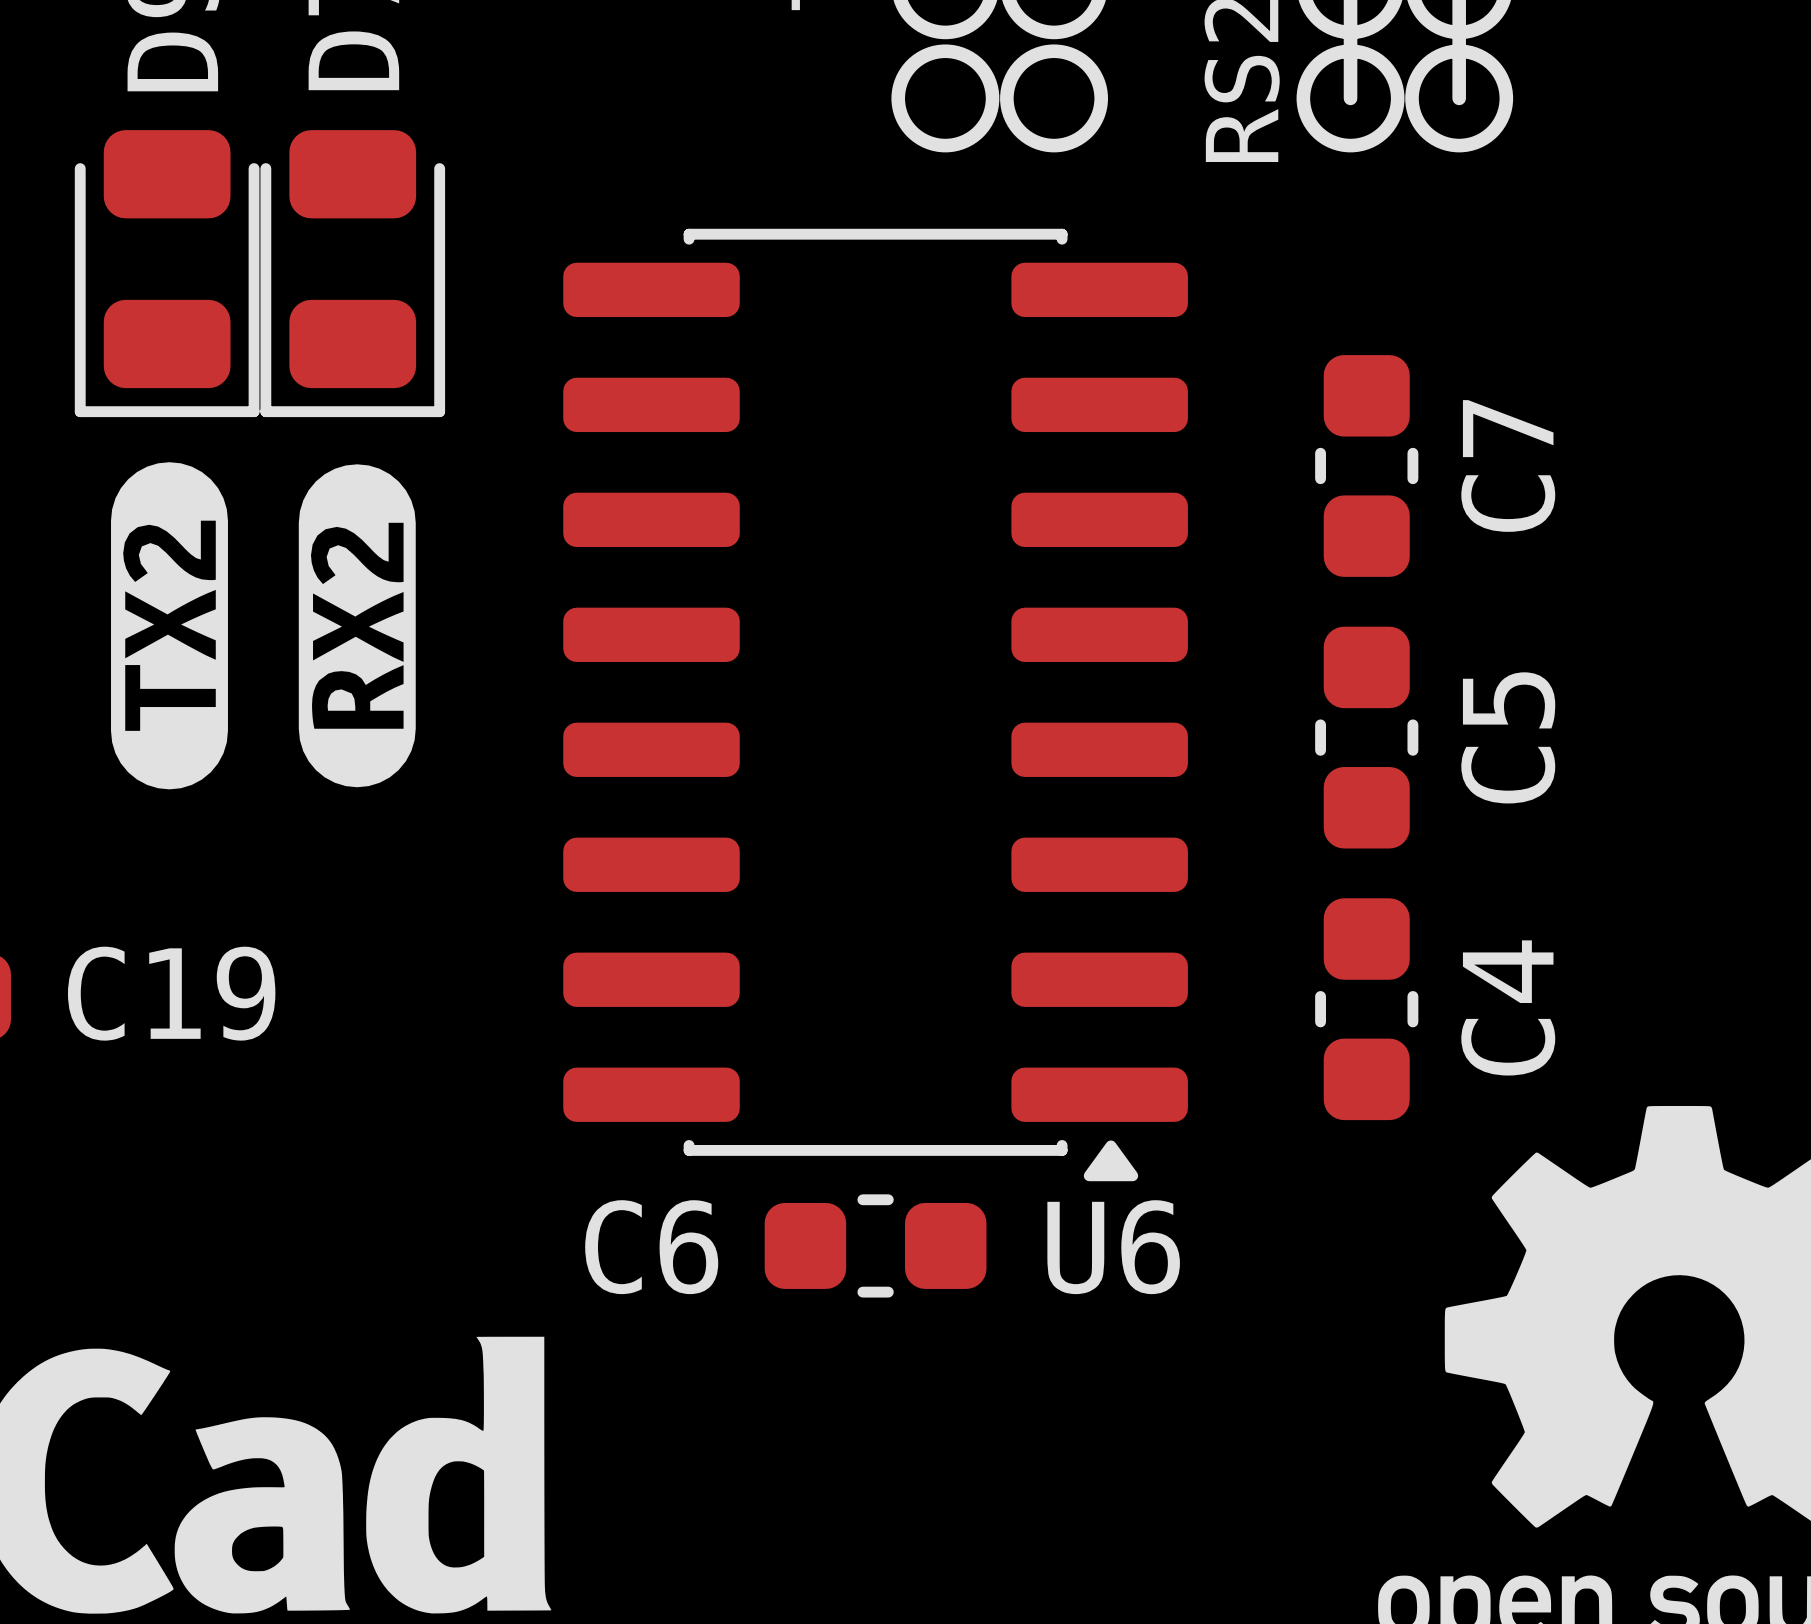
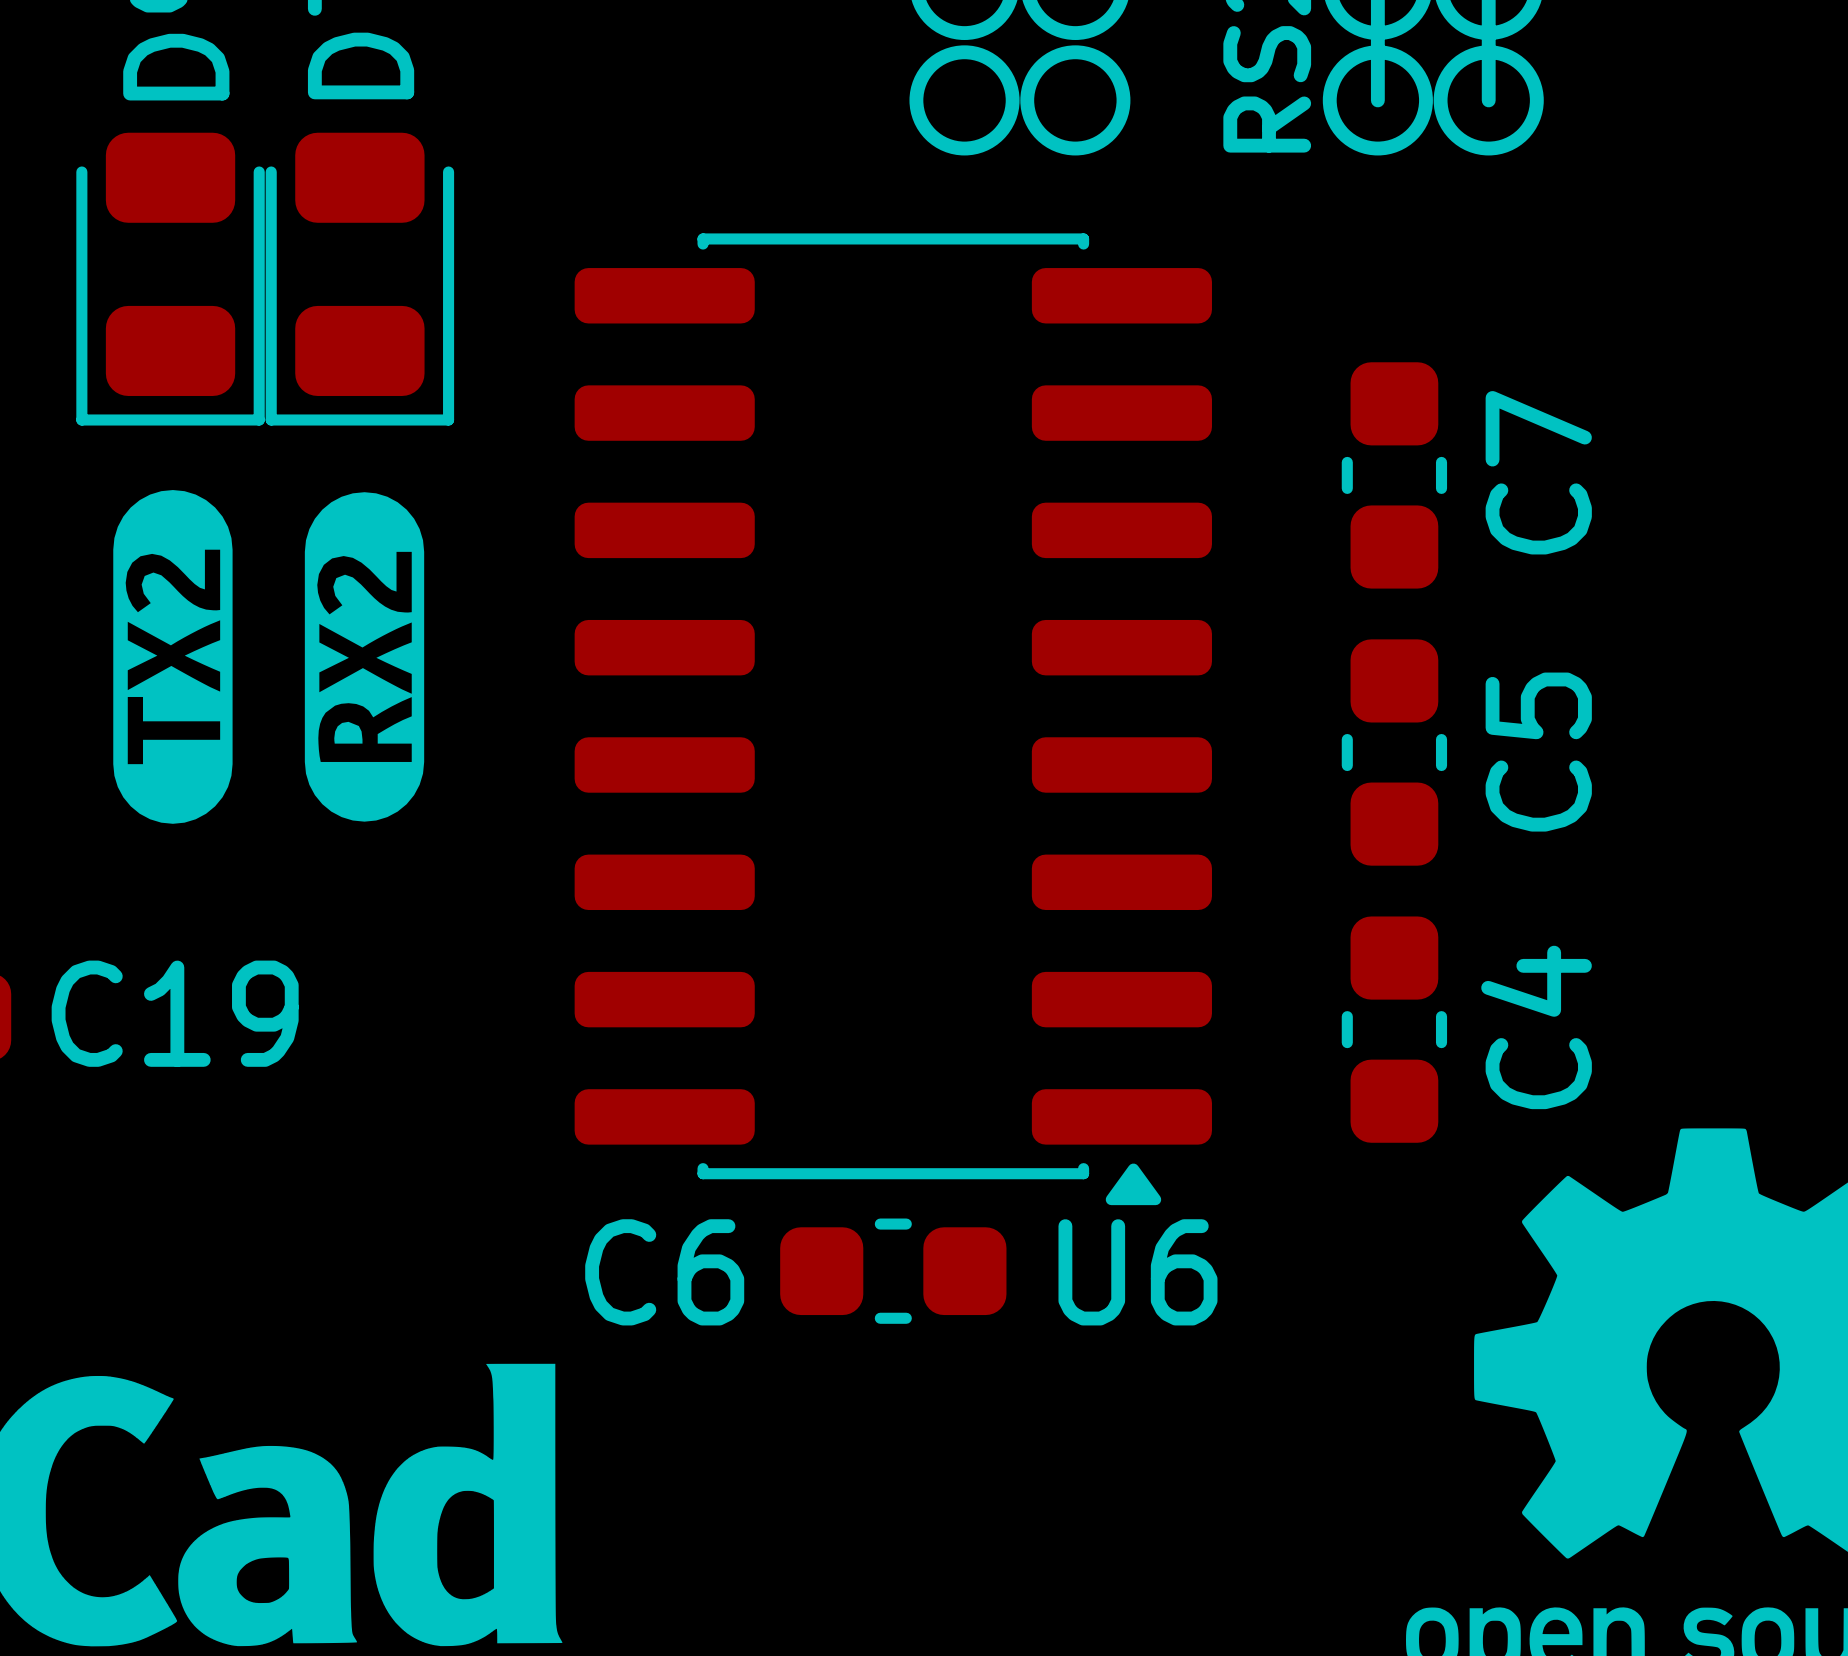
drawing position: (169, 625) -> (172, 656)
drawing position: (357, 625) -> (364, 656)

